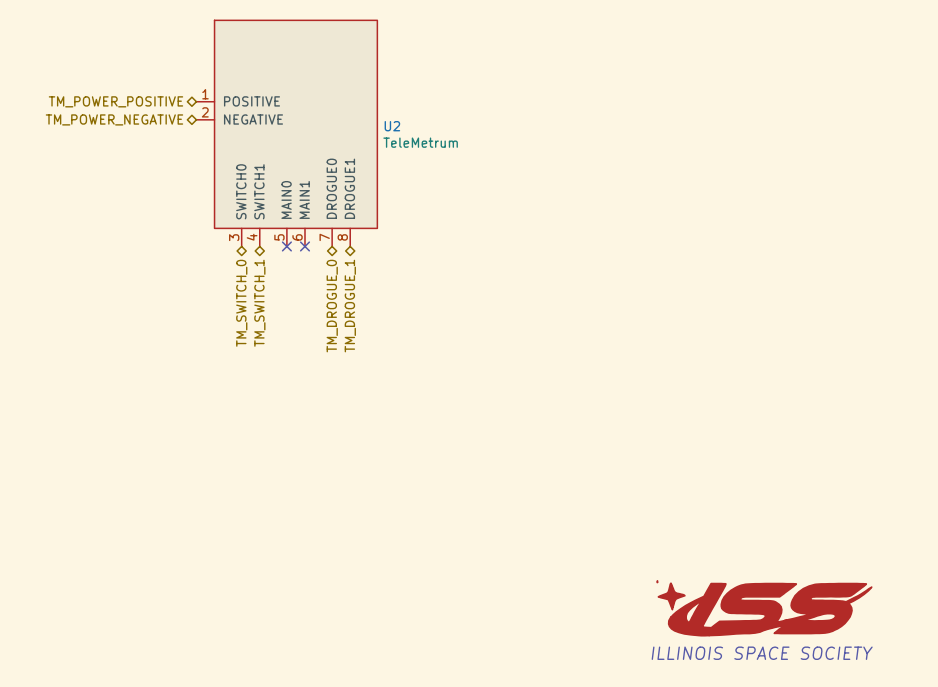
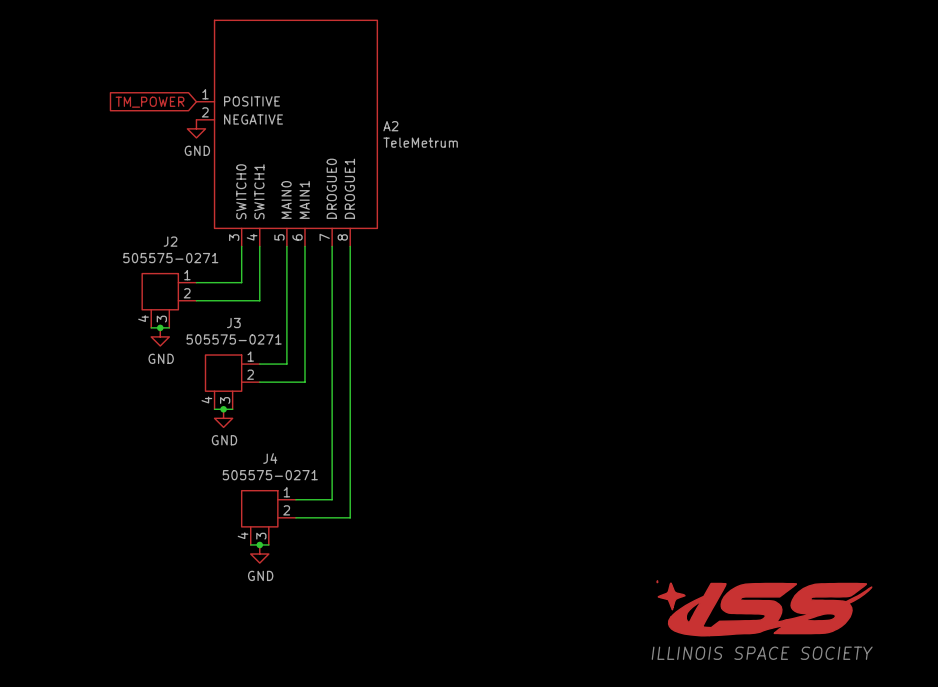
hierarchical label: TM_POWER_POSITIVE (115, 101) -> none
global label: none -> TM_POWER (150, 102)
hierarchical label: TM_POWER_NEGATIVE (114, 119) -> none
U2 name: U2 (392, 126) -> A2 (390, 126)
power symbol: none -> GND (196, 128)
wire: none -> (241, 246) (241, 282) (196, 282)
wire: none -> (259, 246) (259, 300) (196, 300)
wire: none -> (286, 246) (286, 364) (259, 364)
no-connect mark: (286, 246) -> none
wire: none -> (304, 246) (304, 382) (259, 382)
no-connect mark: (304, 246) -> none
wire: none -> (332, 246) (332, 499) (295, 499)
wire: none -> (350, 246) (350, 517) (295, 517)
J2: none -> 505575-0271 (169, 300)
hierarchical label: TM_SWITCH_0 (241, 303) -> none
hierarchical label: TM_SWITCH_1 (259, 303) -> none
hierarchical label: TM_DROGUE_0 (332, 306) -> none
hierarchical label: TM_DROGUE_1 (350, 306) -> none
wire: none -> (151, 327) (169, 327)
junction: none -> (160, 327)
power symbol: none -> GND (160, 336)
J3: none -> 505575-0271 (232, 382)
wire: none -> (214, 409) (232, 409)
junction: none -> (223, 409)
power symbol: none -> GND (223, 418)
J4: none -> 505575-0271 (268, 517)
wire: none -> (250, 544) (268, 544)
junction: none -> (259, 544)
power symbol: none -> GND (259, 554)

